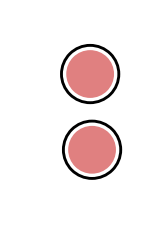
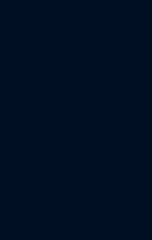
part: (90, 74) -> none
part: (92, 149) -> none

